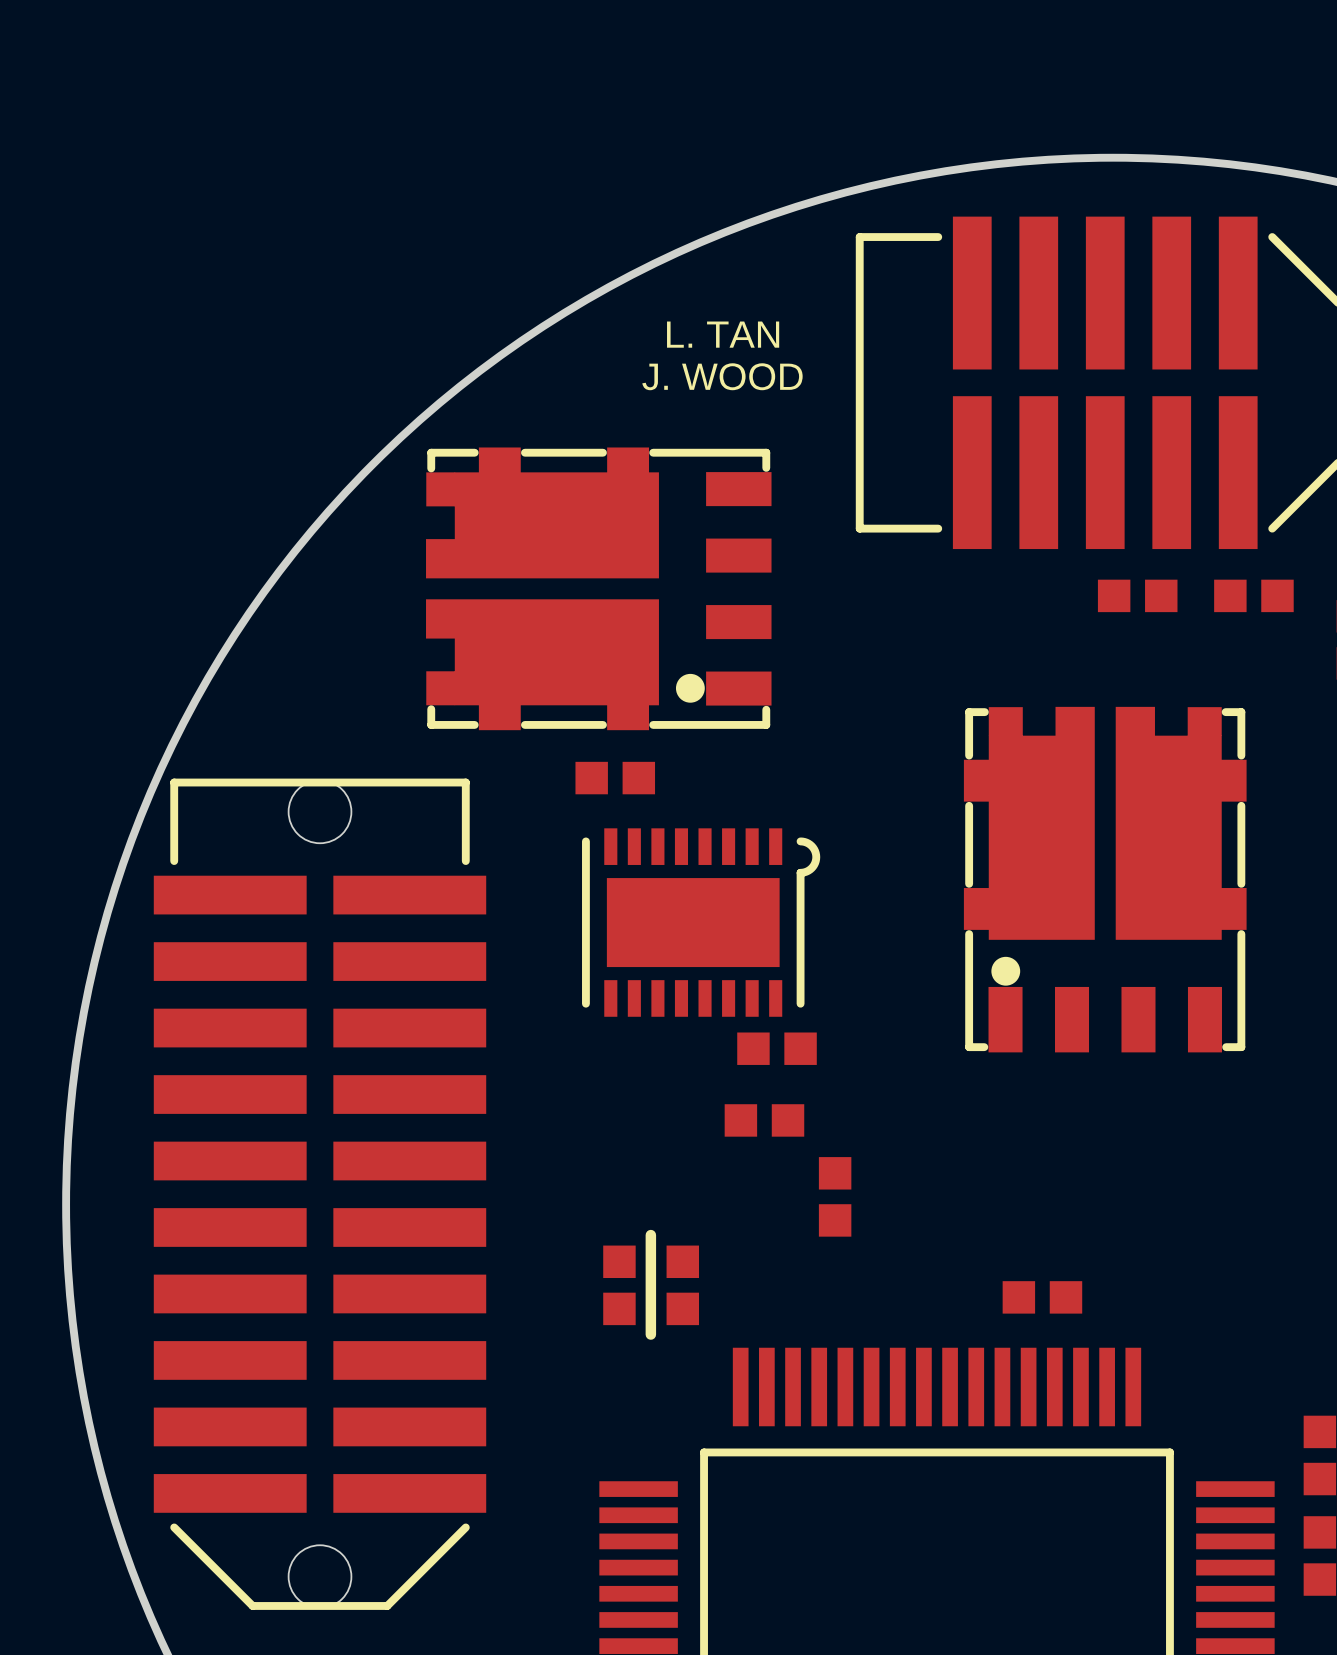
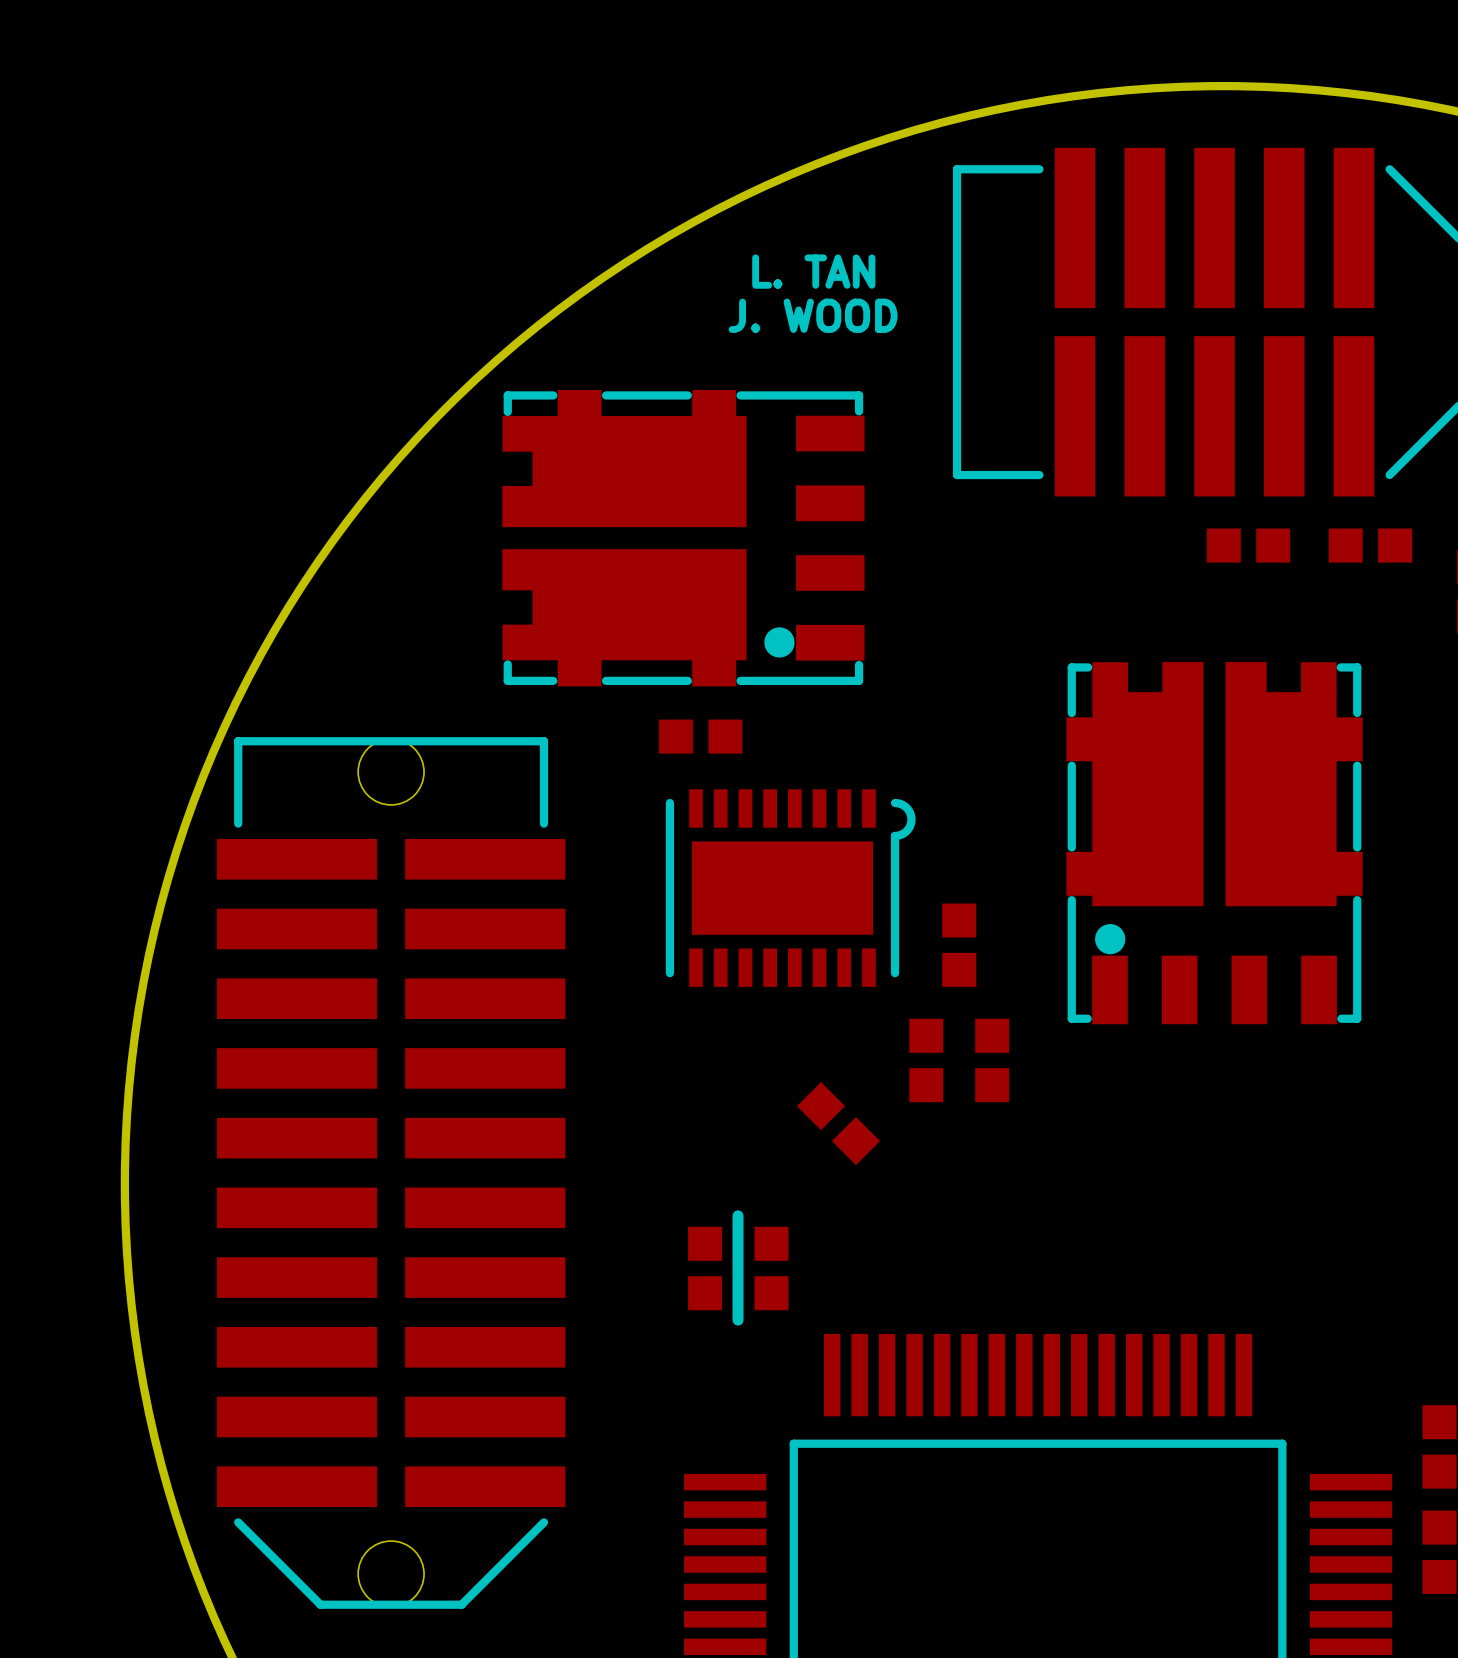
part: none -> (959, 945)
part: (777, 1048) -> none
part: none -> (926, 1060)
part: none -> (992, 1060)
part rotation: 0° (764, 1120) -> 45° clockwise (838, 1123)
part: (835, 1196) -> none
part: (1042, 1297) -> none

